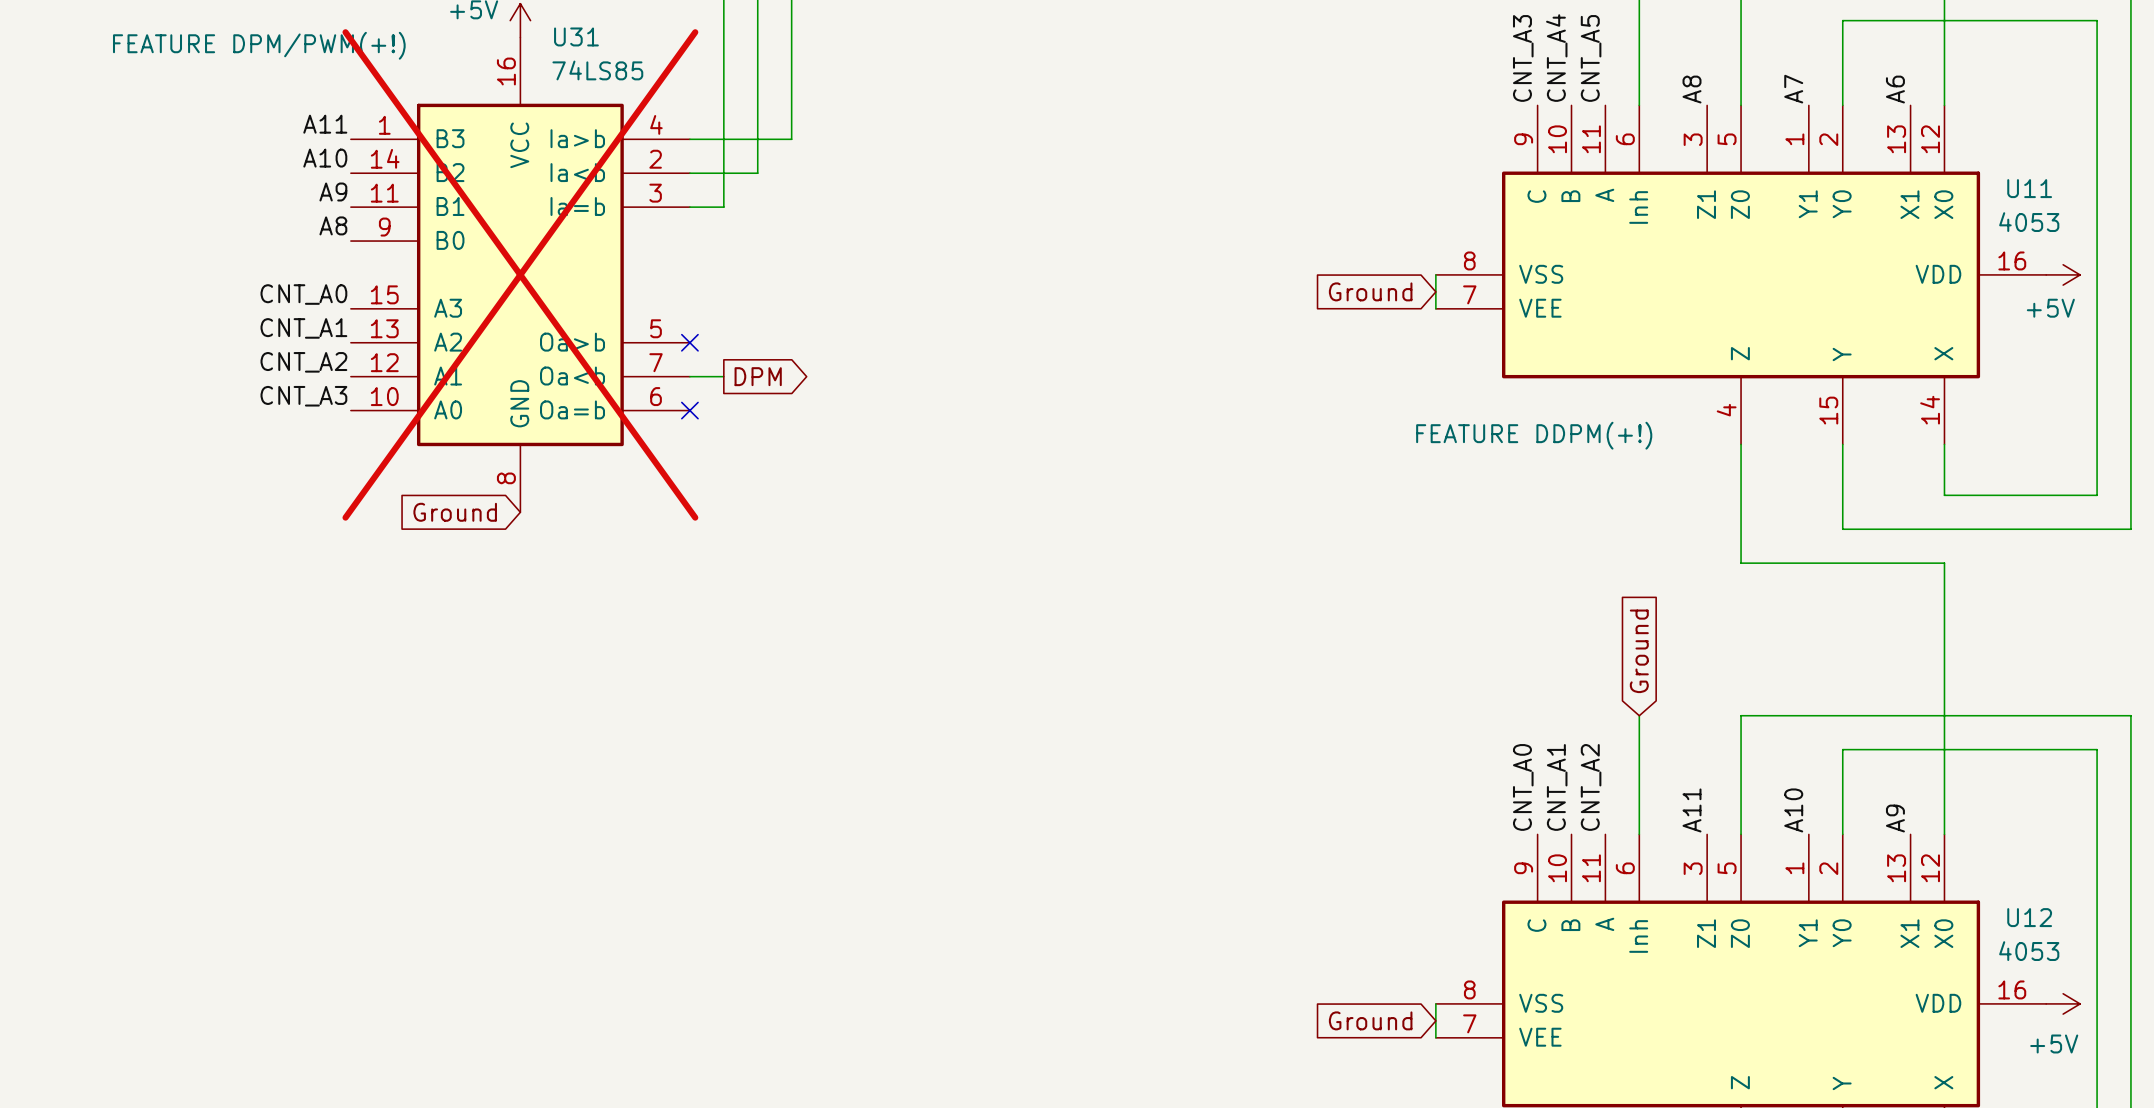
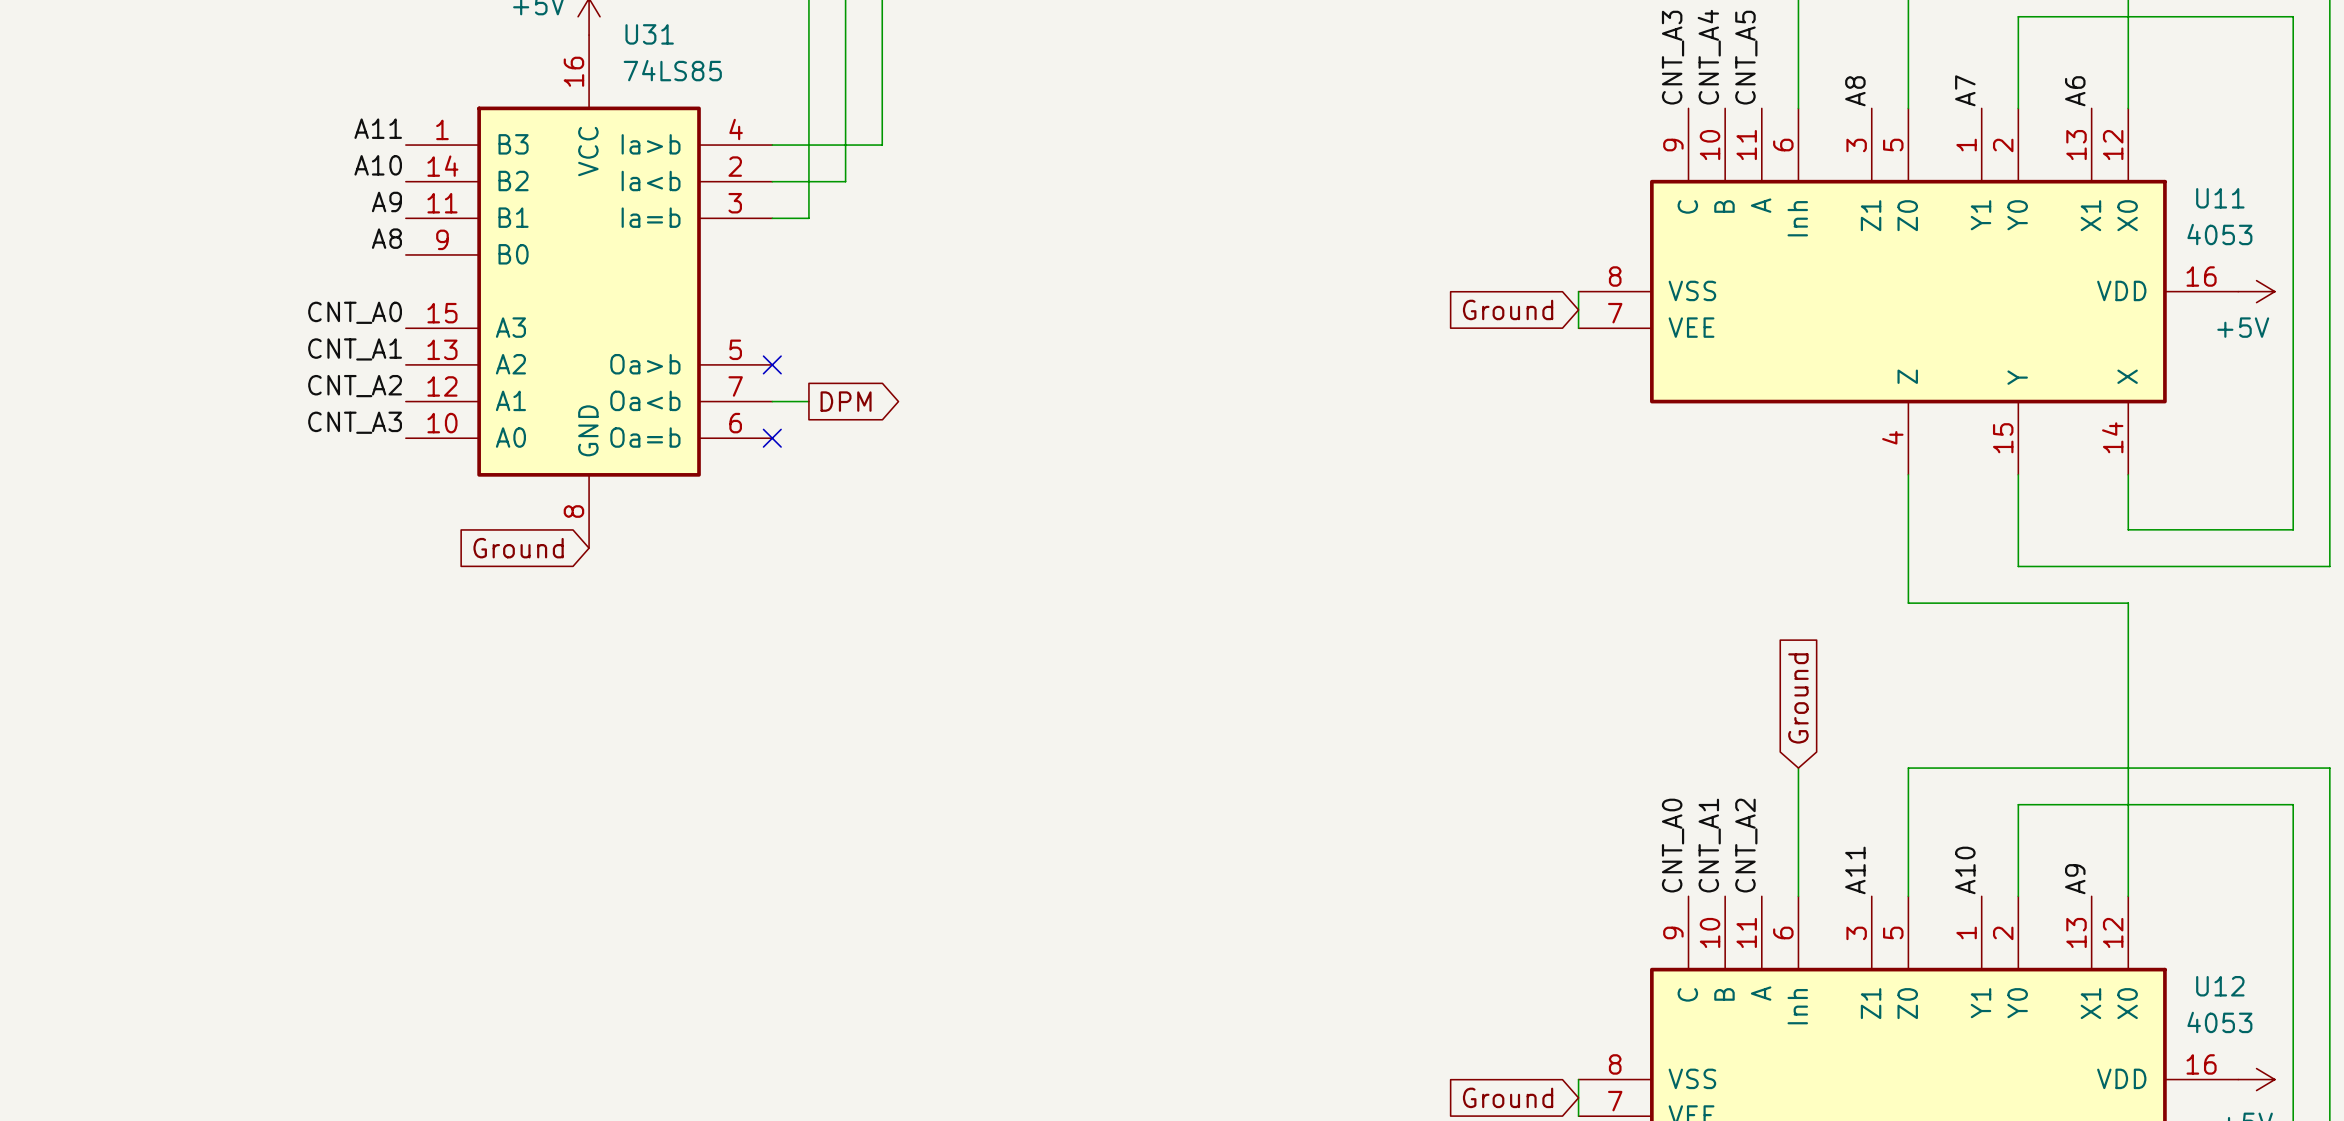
U31 text: FEATURE DPM/PWM(+!) (259, 45) -> none
U31 do-not-place cross: (520, 274) -> none
U11 text: FEATURE DDPM(+!) (1534, 435) -> none

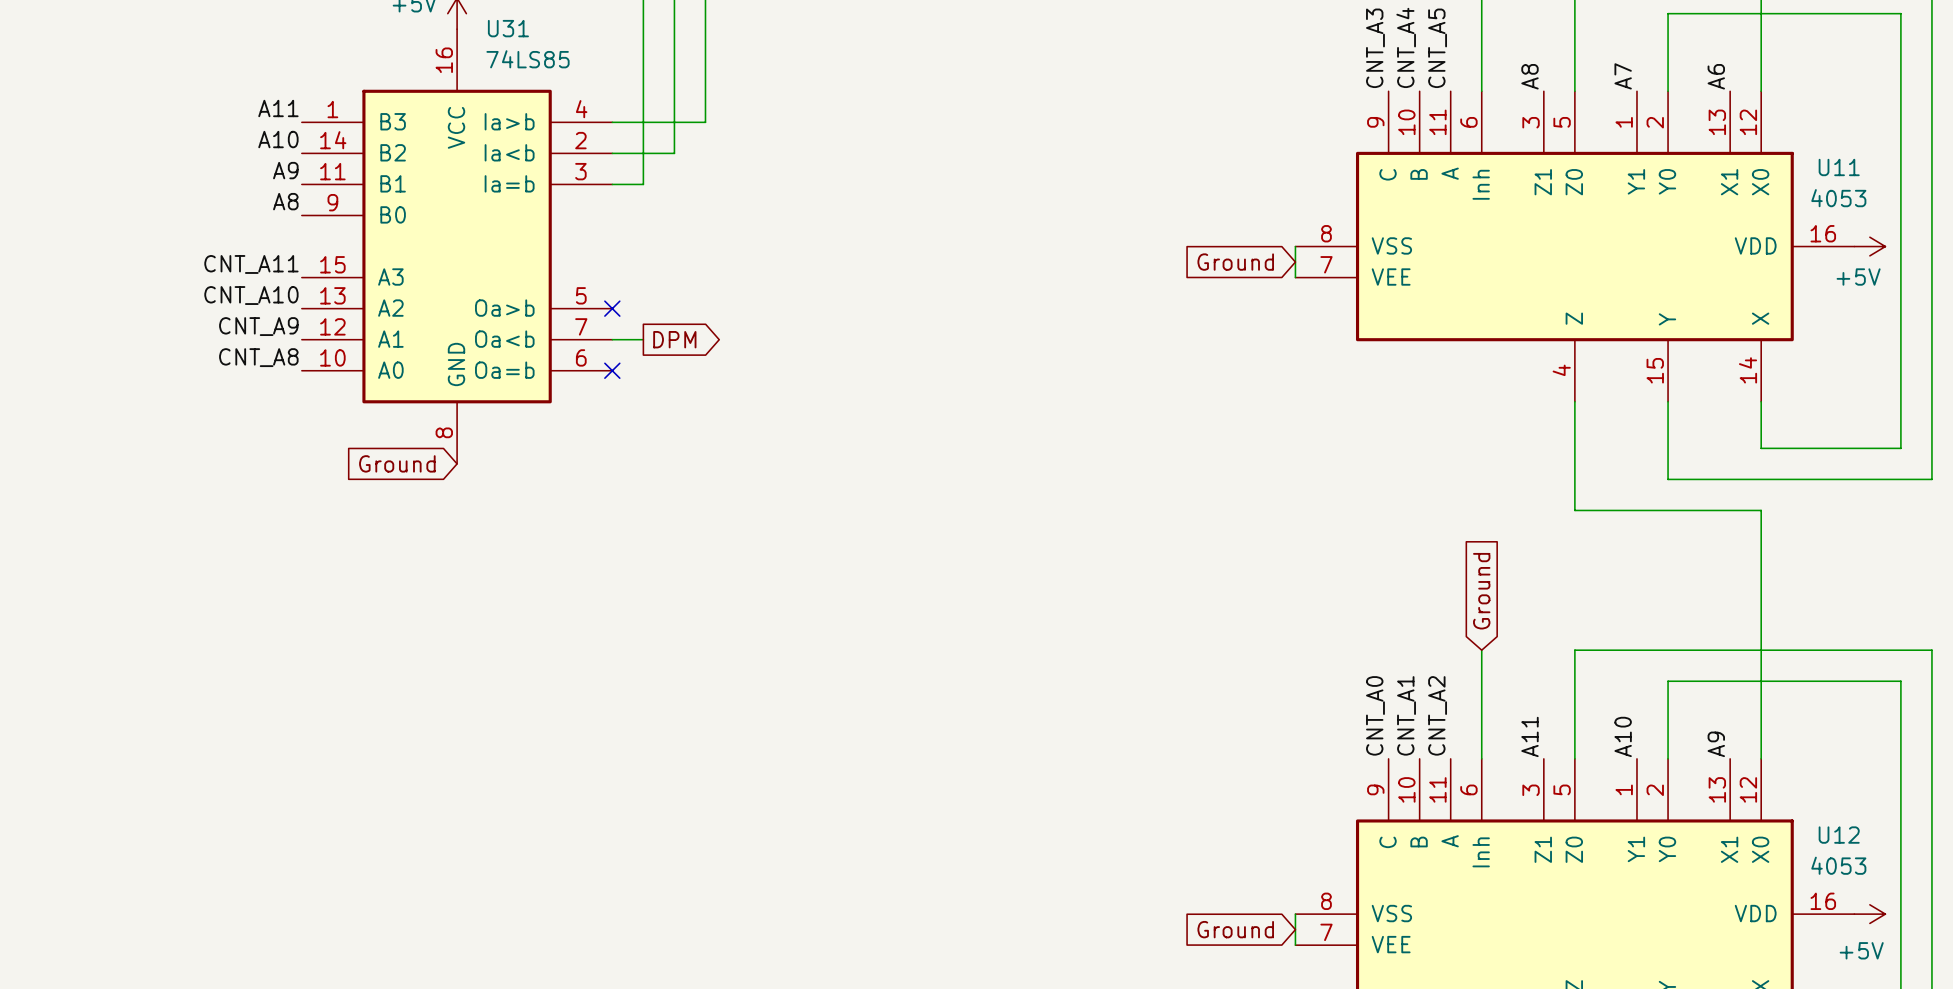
label: CNT_A0 (355, 312) -> CNT_A11 (251, 264)
label: CNT_A1 (355, 349) -> CNT_A10 (251, 295)
label: CNT_A2 (355, 386) -> CNT_A9 (258, 326)
label: CNT_A3 (355, 422) -> CNT_A8 (258, 357)

